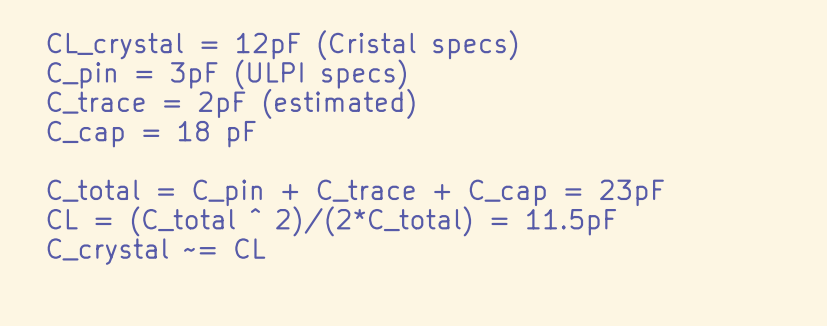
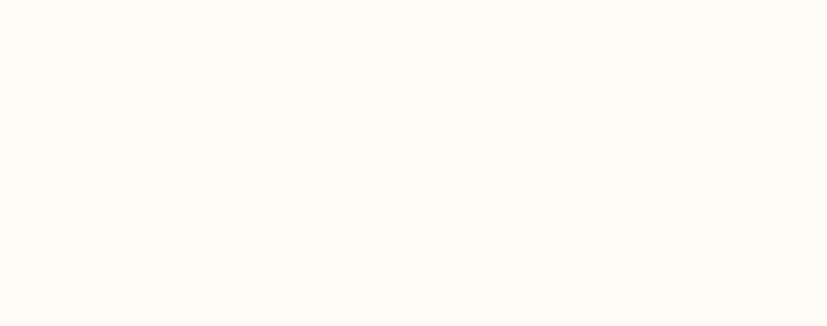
text: CL_crystal = 12pF (Cristal specs) (282, 45) -> none
text: C_pin = 3pF (ULPI specs) (226, 74) -> none
text: C_trace = 2pF (estimated) (231, 103) -> none
text: C_cap = 18 pF (151, 134) -> none
text: C_total = C_pin + C_trace + C_cap = 23pF (355, 192) -> none
text: CL = (C_total ^ 2)/(2*C_total) = 11.5pF (331, 221) -> none
text: C_crystal ~= CL (156, 251) -> none

